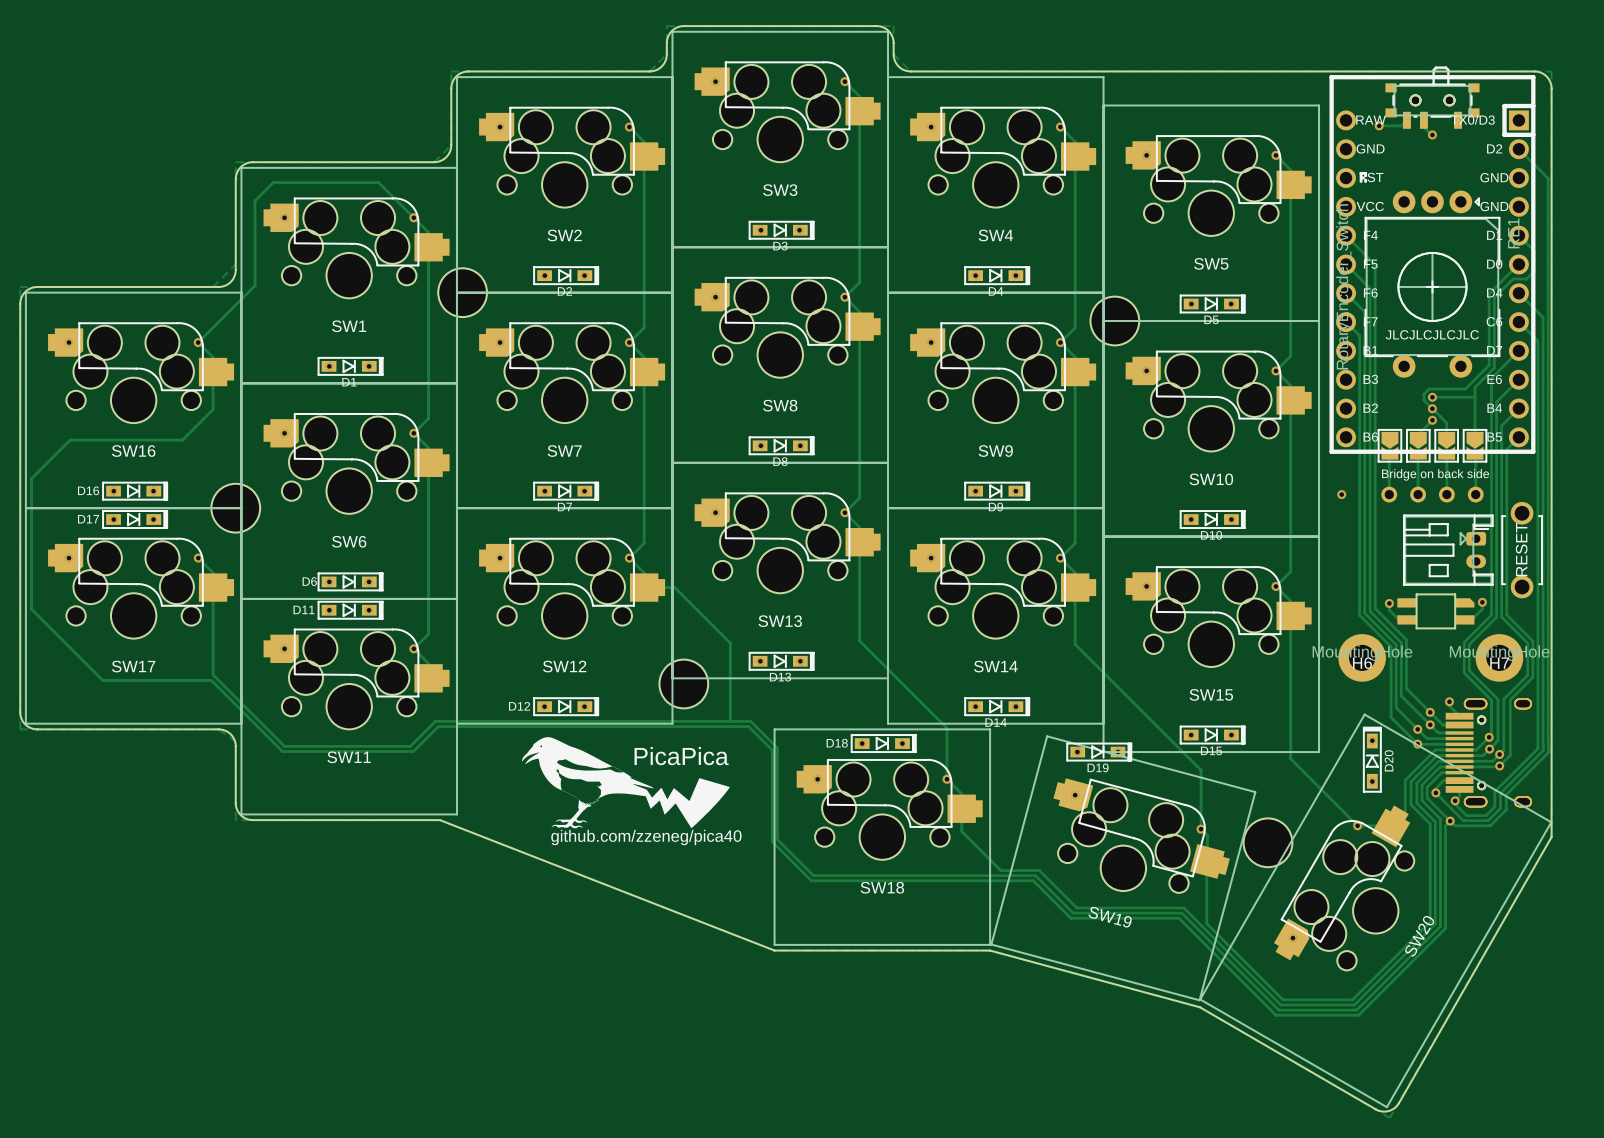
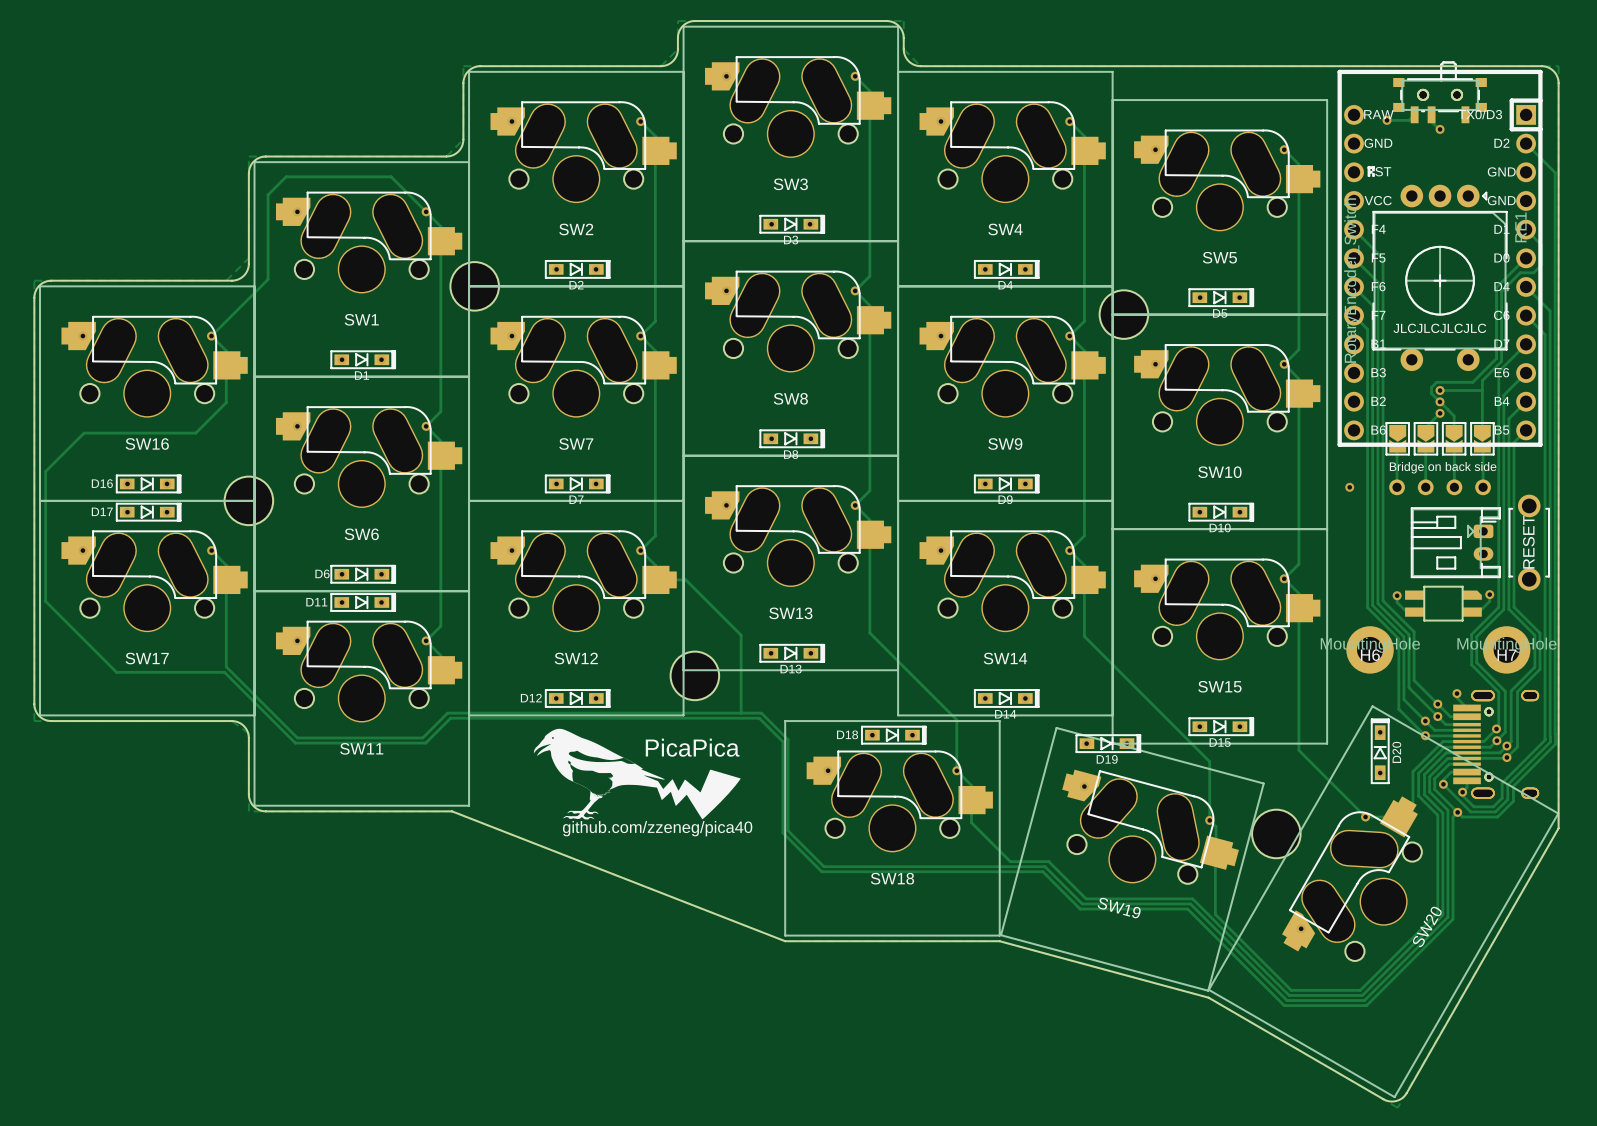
SW3 footprint: [671, 31, 889, 248] -> [683, 26, 899, 242]
SW2 footprint: [456, 76, 674, 294] -> [468, 71, 685, 287]
SW4 footprint: [887, 76, 1105, 294] -> [897, 71, 1114, 287]
SW5 footprint: [1102, 104, 1320, 322] -> [1112, 99, 1328, 316]
SW1 footprint: [240, 167, 458, 384] -> [253, 161, 470, 378]
SW8 footprint: [671, 246, 889, 464] -> [683, 240, 899, 457]
SW16 footprint: [25, 292, 243, 509] -> [39, 285, 256, 502]
SW7 footprint: [456, 292, 674, 509] -> [468, 285, 685, 502]
SW9 footprint: [887, 292, 1105, 509] -> [897, 285, 1114, 502]
SW10 footprint: [1102, 320, 1320, 538] -> [1112, 314, 1328, 530]
SW6 footprint: [240, 382, 458, 600] -> [253, 376, 470, 592]
SW13 footprint: [671, 462, 889, 679] -> [683, 455, 899, 671]
SW17 footprint: [25, 507, 243, 725] -> [39, 500, 256, 716]
SW12 footprint: [456, 507, 674, 725] -> [468, 500, 685, 716]
SW14 footprint: [887, 507, 1105, 725] -> [897, 500, 1114, 716]
SW15 footprint: [1102, 535, 1320, 753] -> [1112, 528, 1328, 745]
SW11 footprint: [240, 598, 458, 816] -> [253, 590, 470, 807]
SW20 footprint: [1199, 713, 1552, 1108] -> [1208, 705, 1559, 1098]
SW18 footprint: [774, 728, 991, 946] -> [784, 720, 1001, 937]
SW19 footprint: [990, 735, 1256, 1001] -> [1000, 727, 1265, 992]

